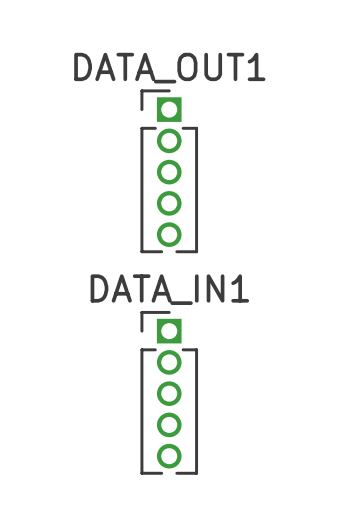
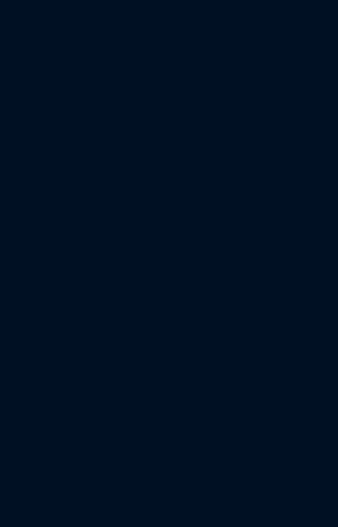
DATA_OUT1: (169, 171) -> none
DATA_IN1: (169, 392) -> none

